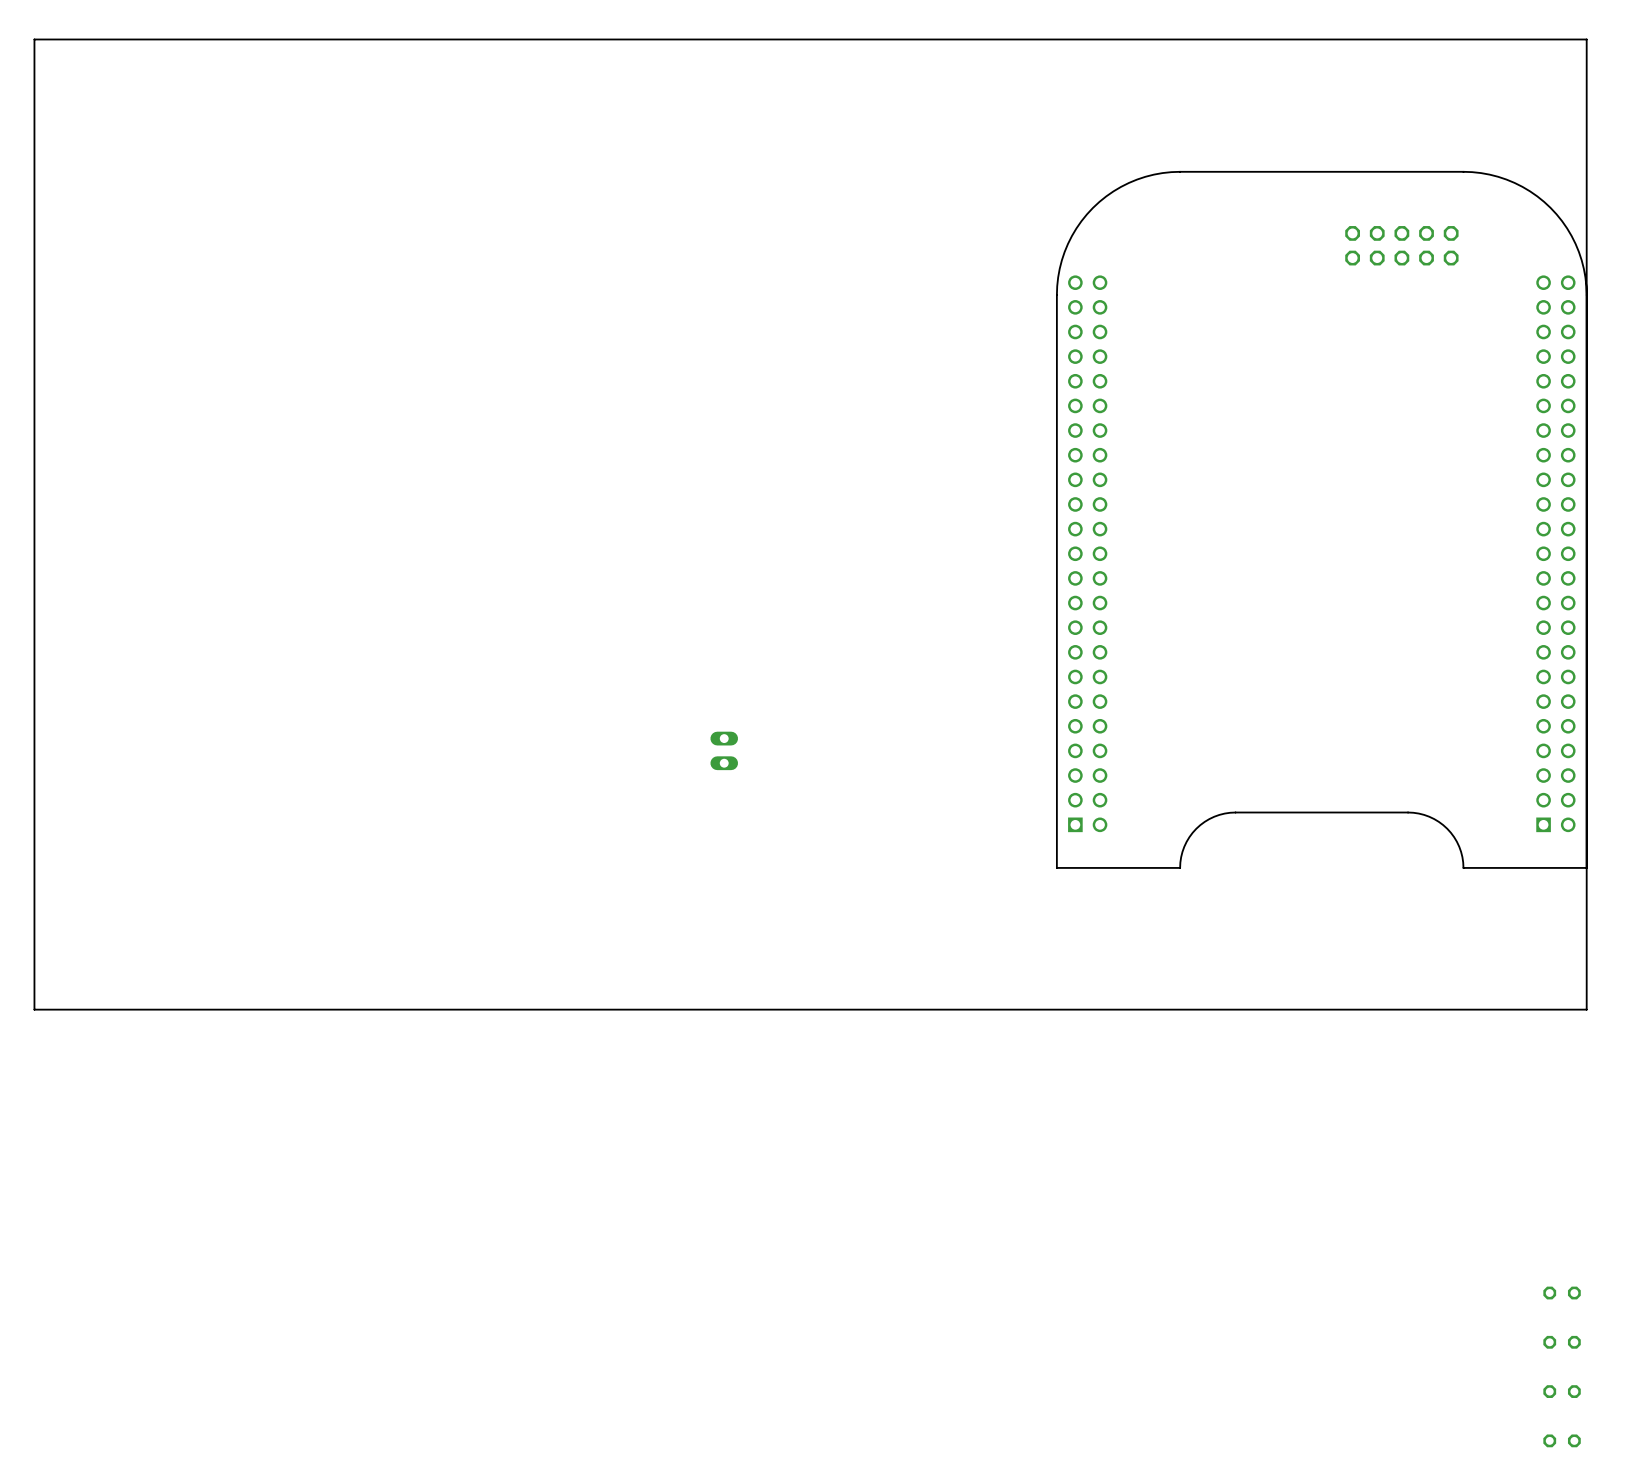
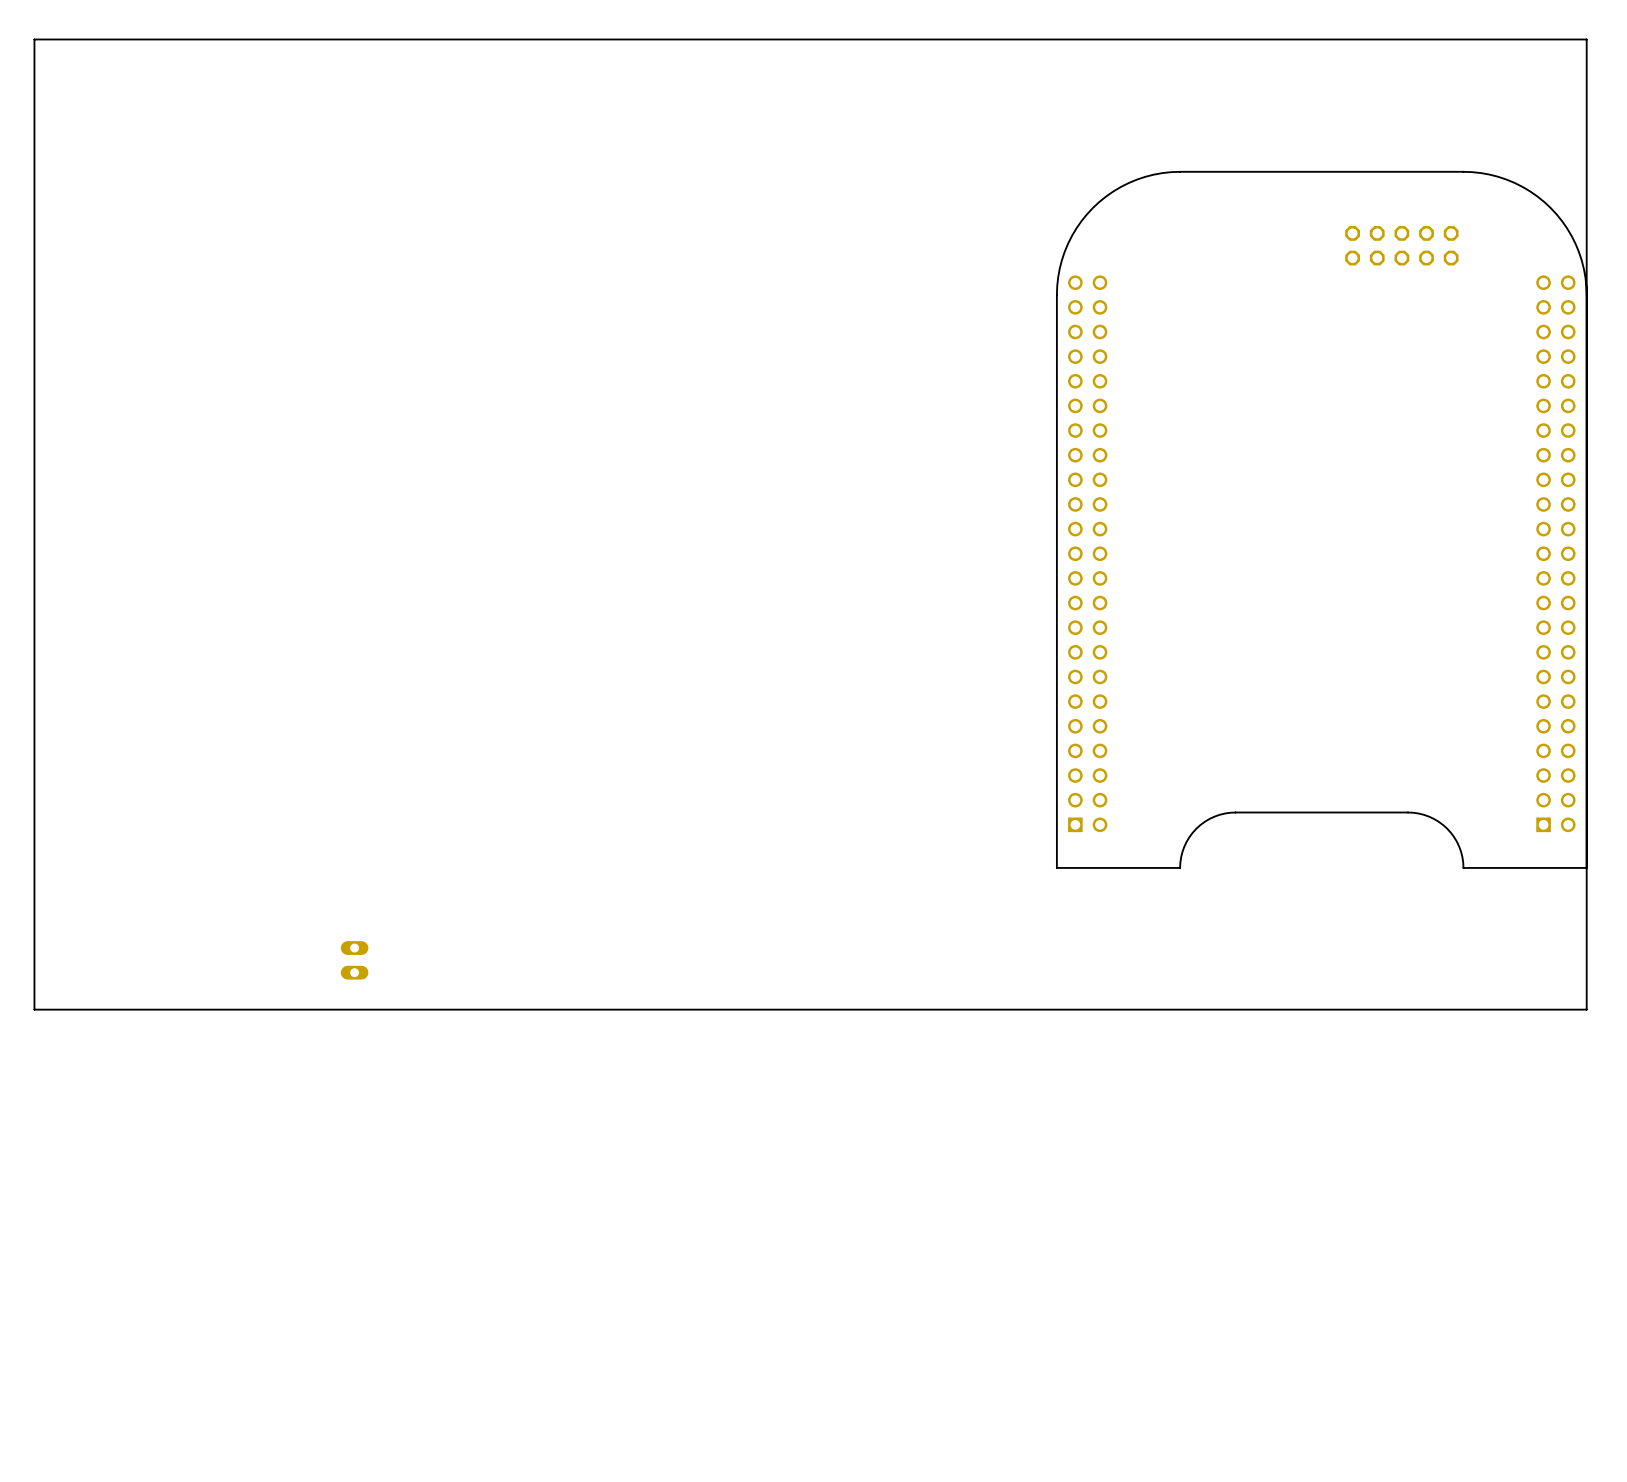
part: (724, 750) -> none
part: none -> (354, 960)
part: (1562, 1293) -> none
part: (1562, 1342) -> none
part: (1562, 1391) -> none
part: (1562, 1440) -> none

